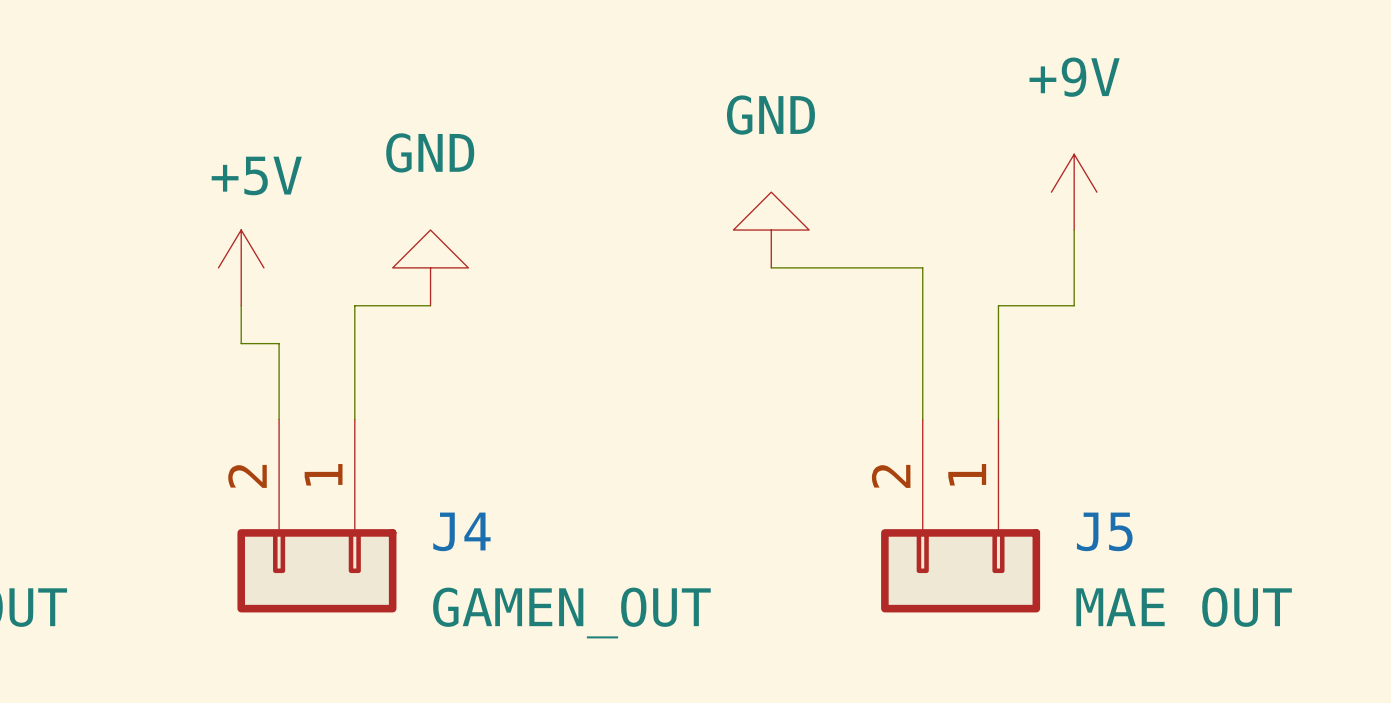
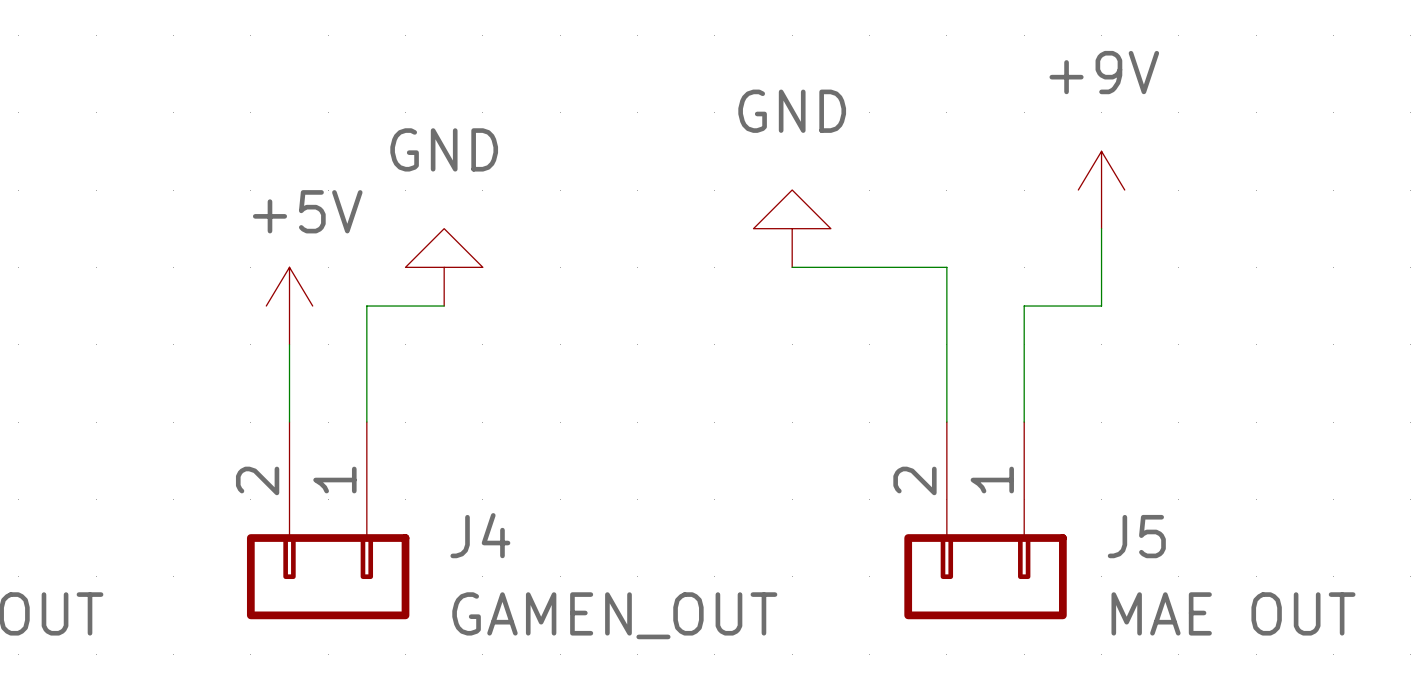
power symbol position: +5V (241, 267) -> +5V (289, 306)
wire: (241, 305) (241, 343) (279, 343) -> none

